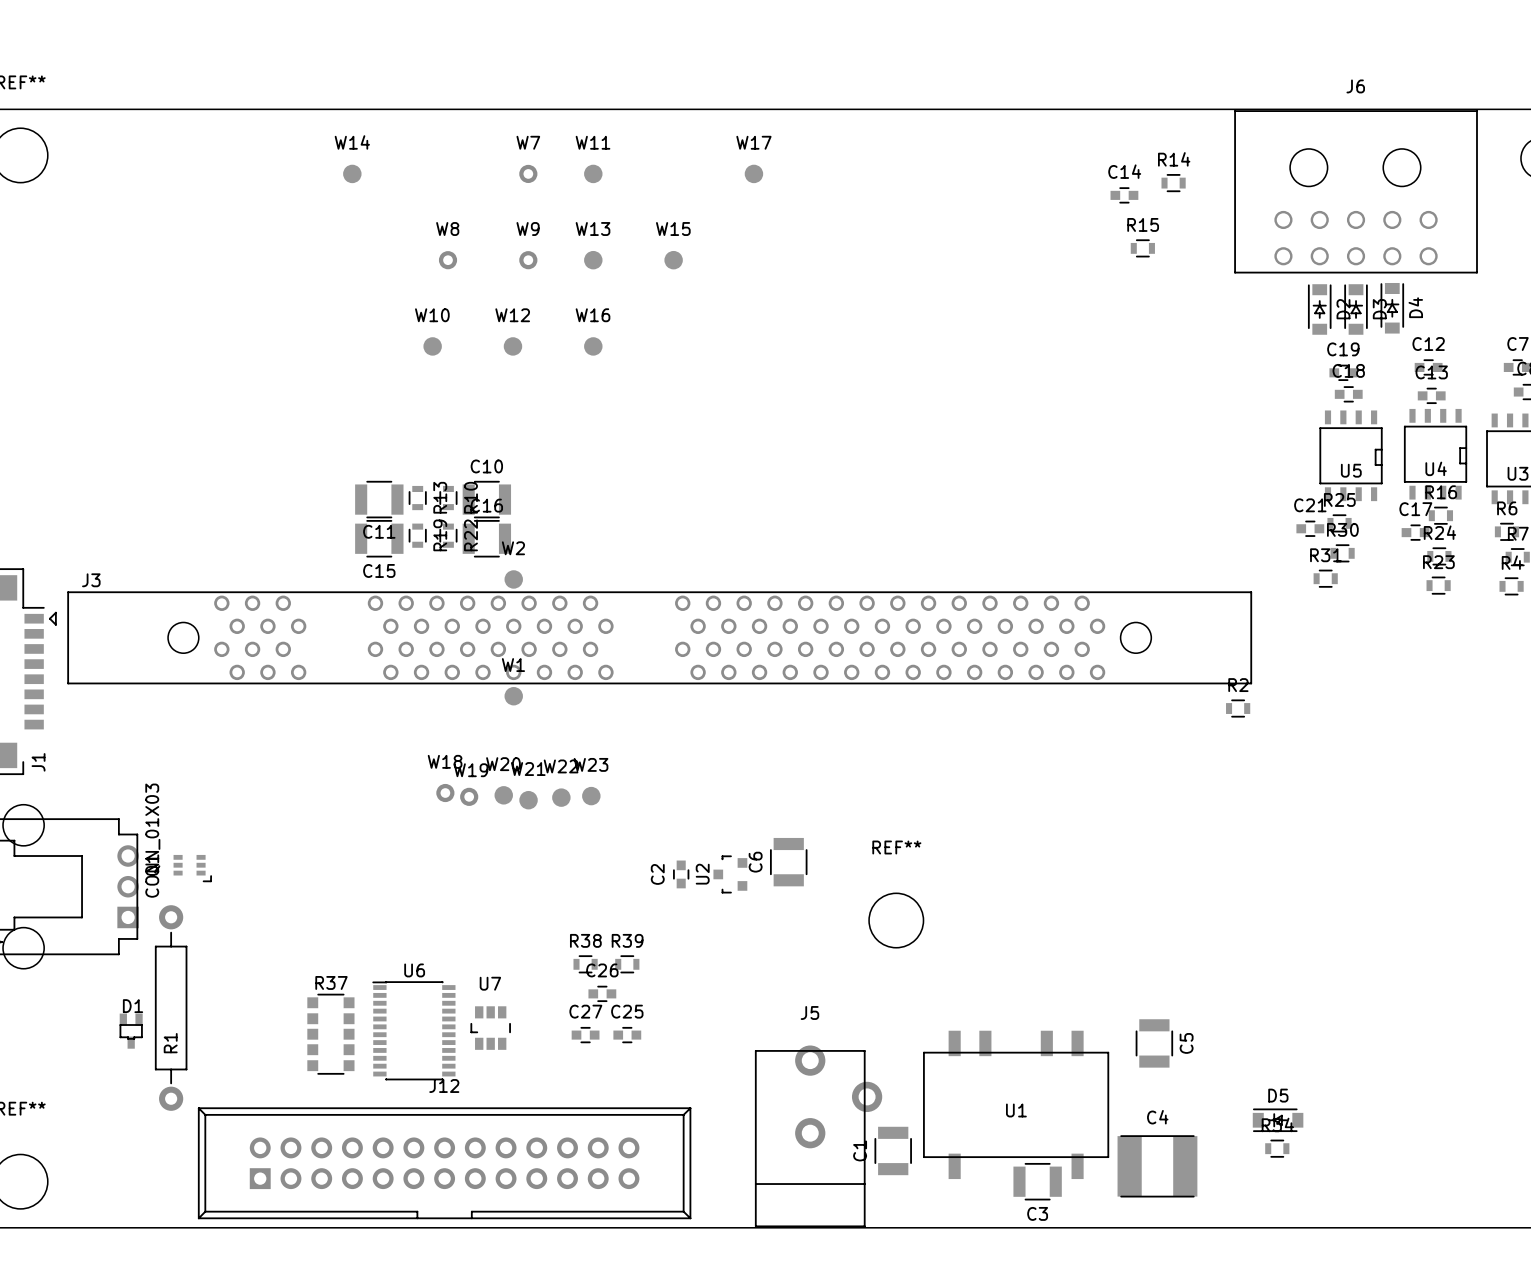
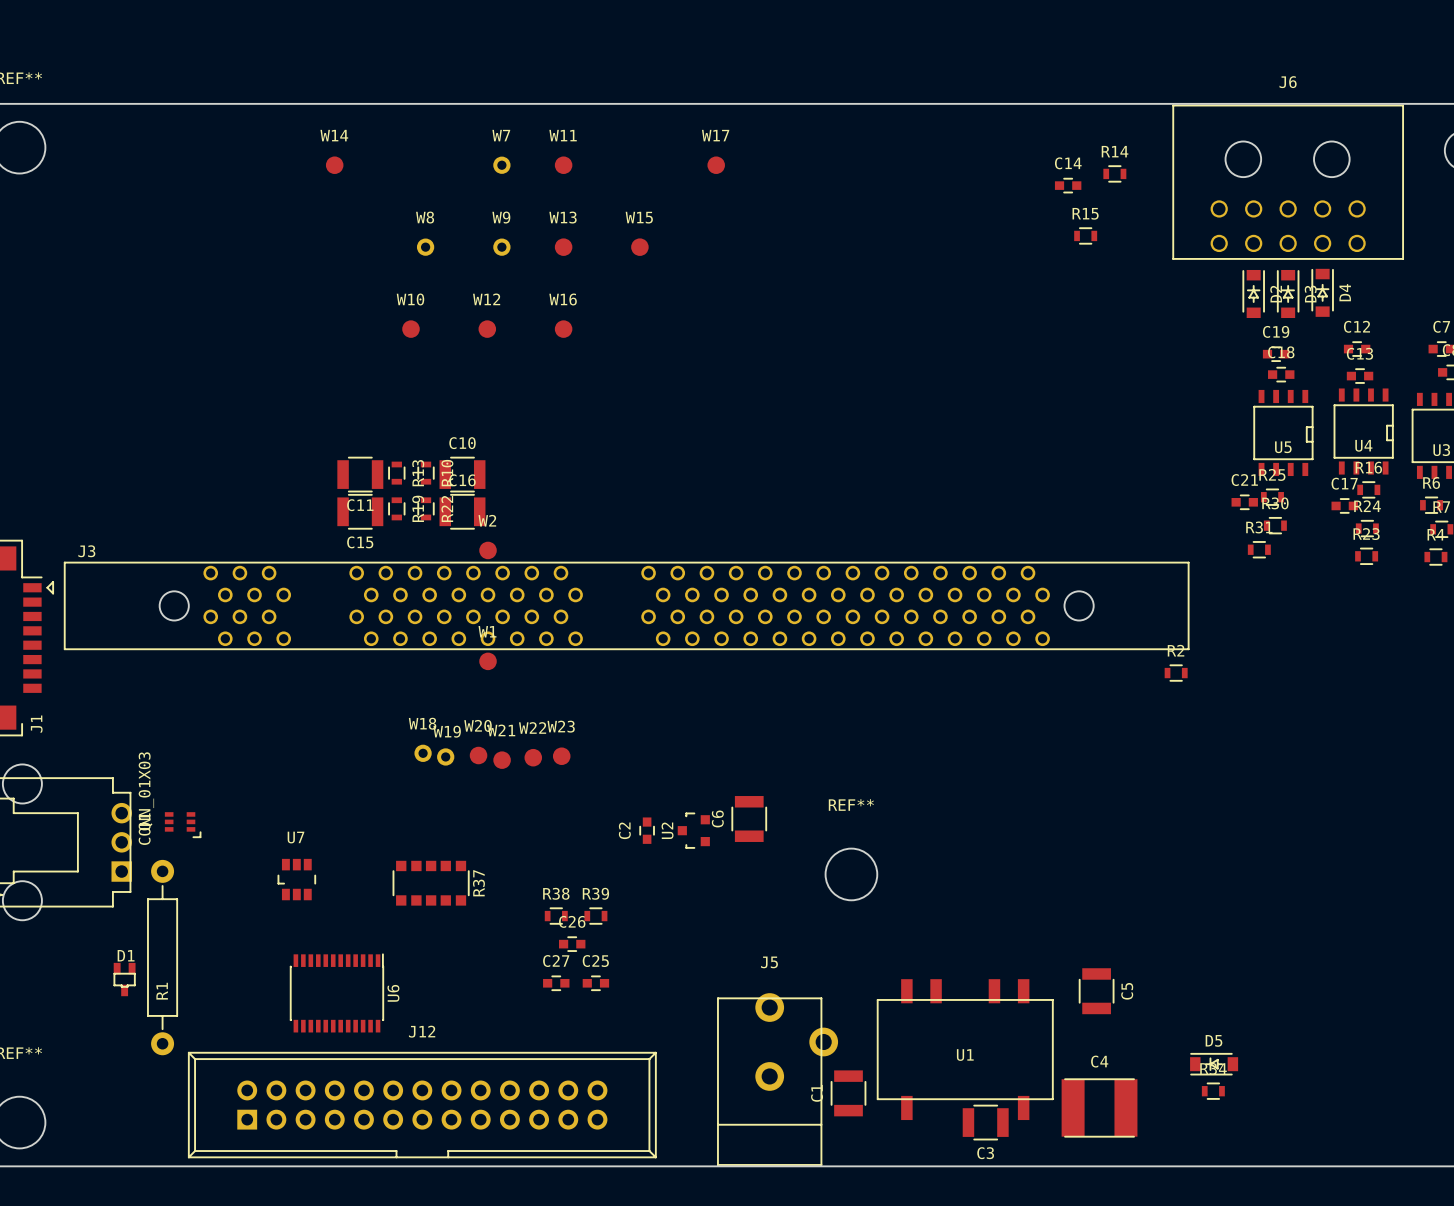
U7 position: (490, 1028) -> (296, 879)
U6 rotation: 0° (413, 1030) -> 90° clockwise (336, 992)
U6 position: (413, 1030) -> (336, 992)
R37 rotation: 0° (330, 1034) -> 90° clockwise (431, 883)
R37 position: (330, 1034) -> (431, 883)

